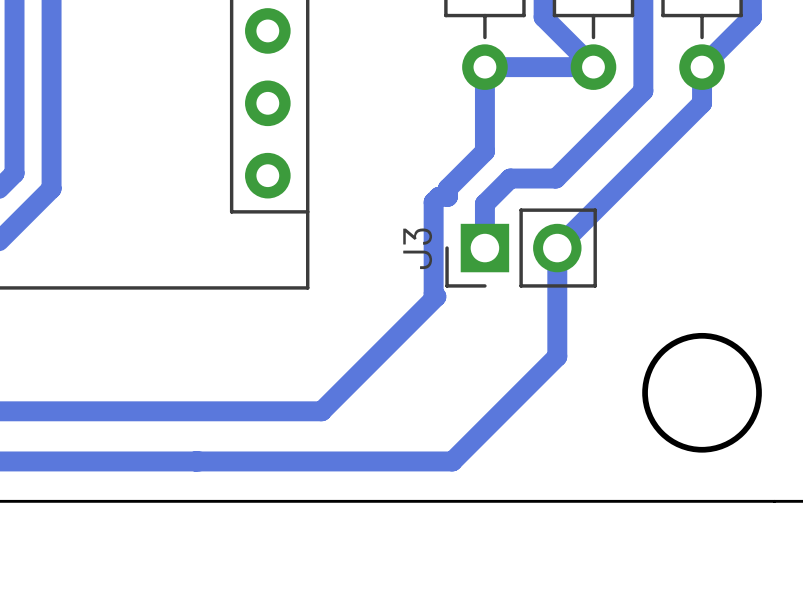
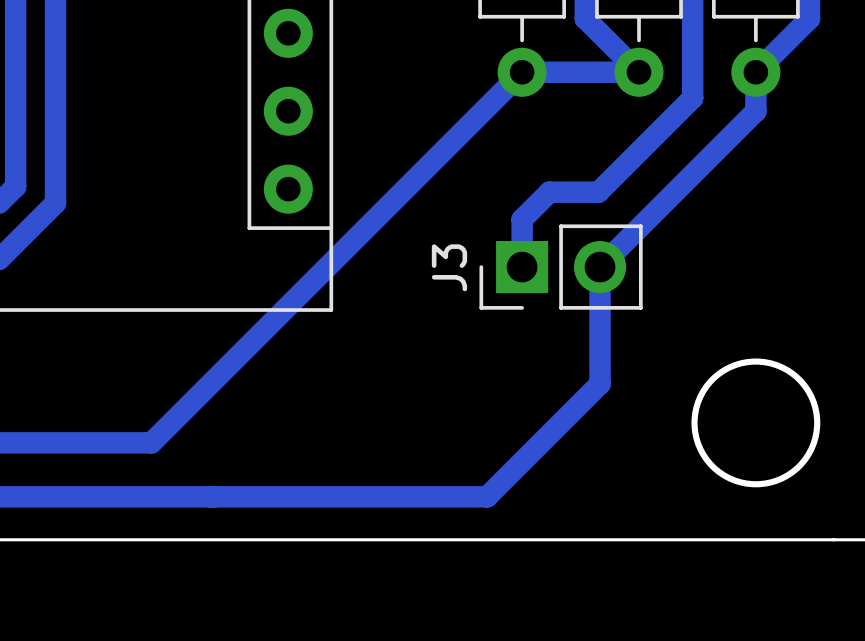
bottom track: (484, 67) (484, 151) (447, 188) (447, 196) (439, 196) (433, 202) (433, 293) (436, 296) (321, 411) (140, 411) -> (522, 72) (151, 442)

